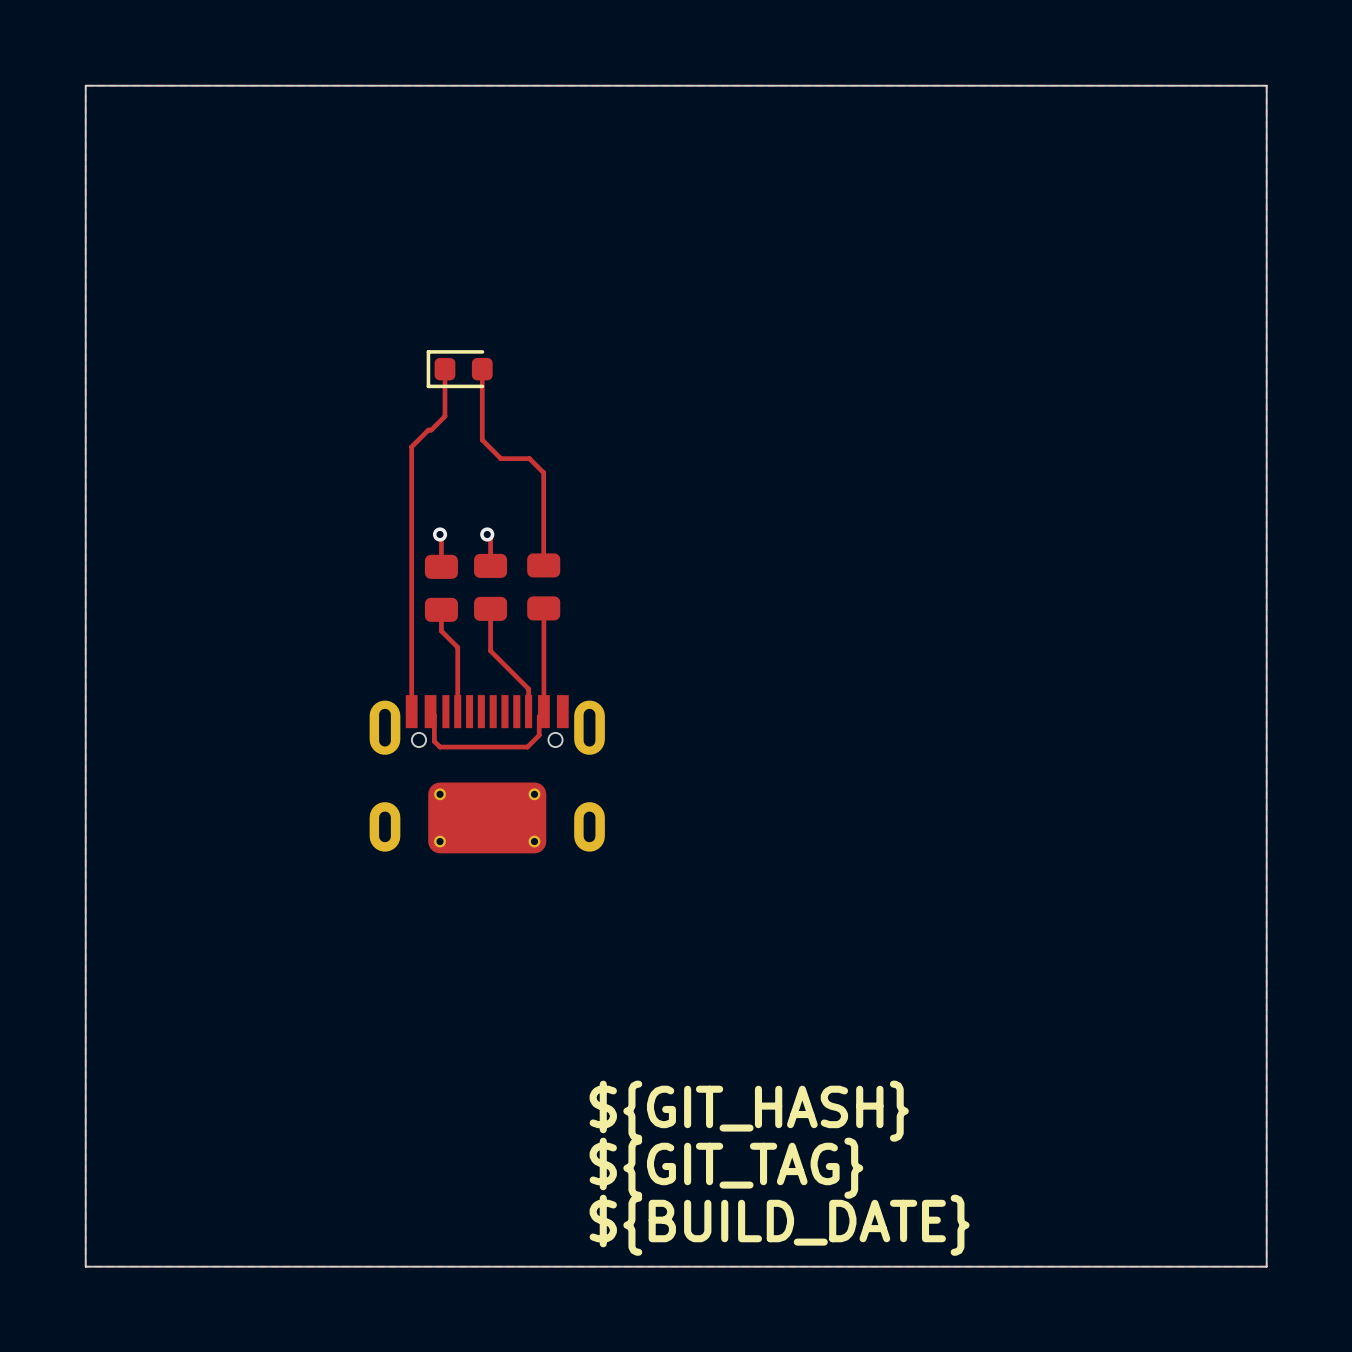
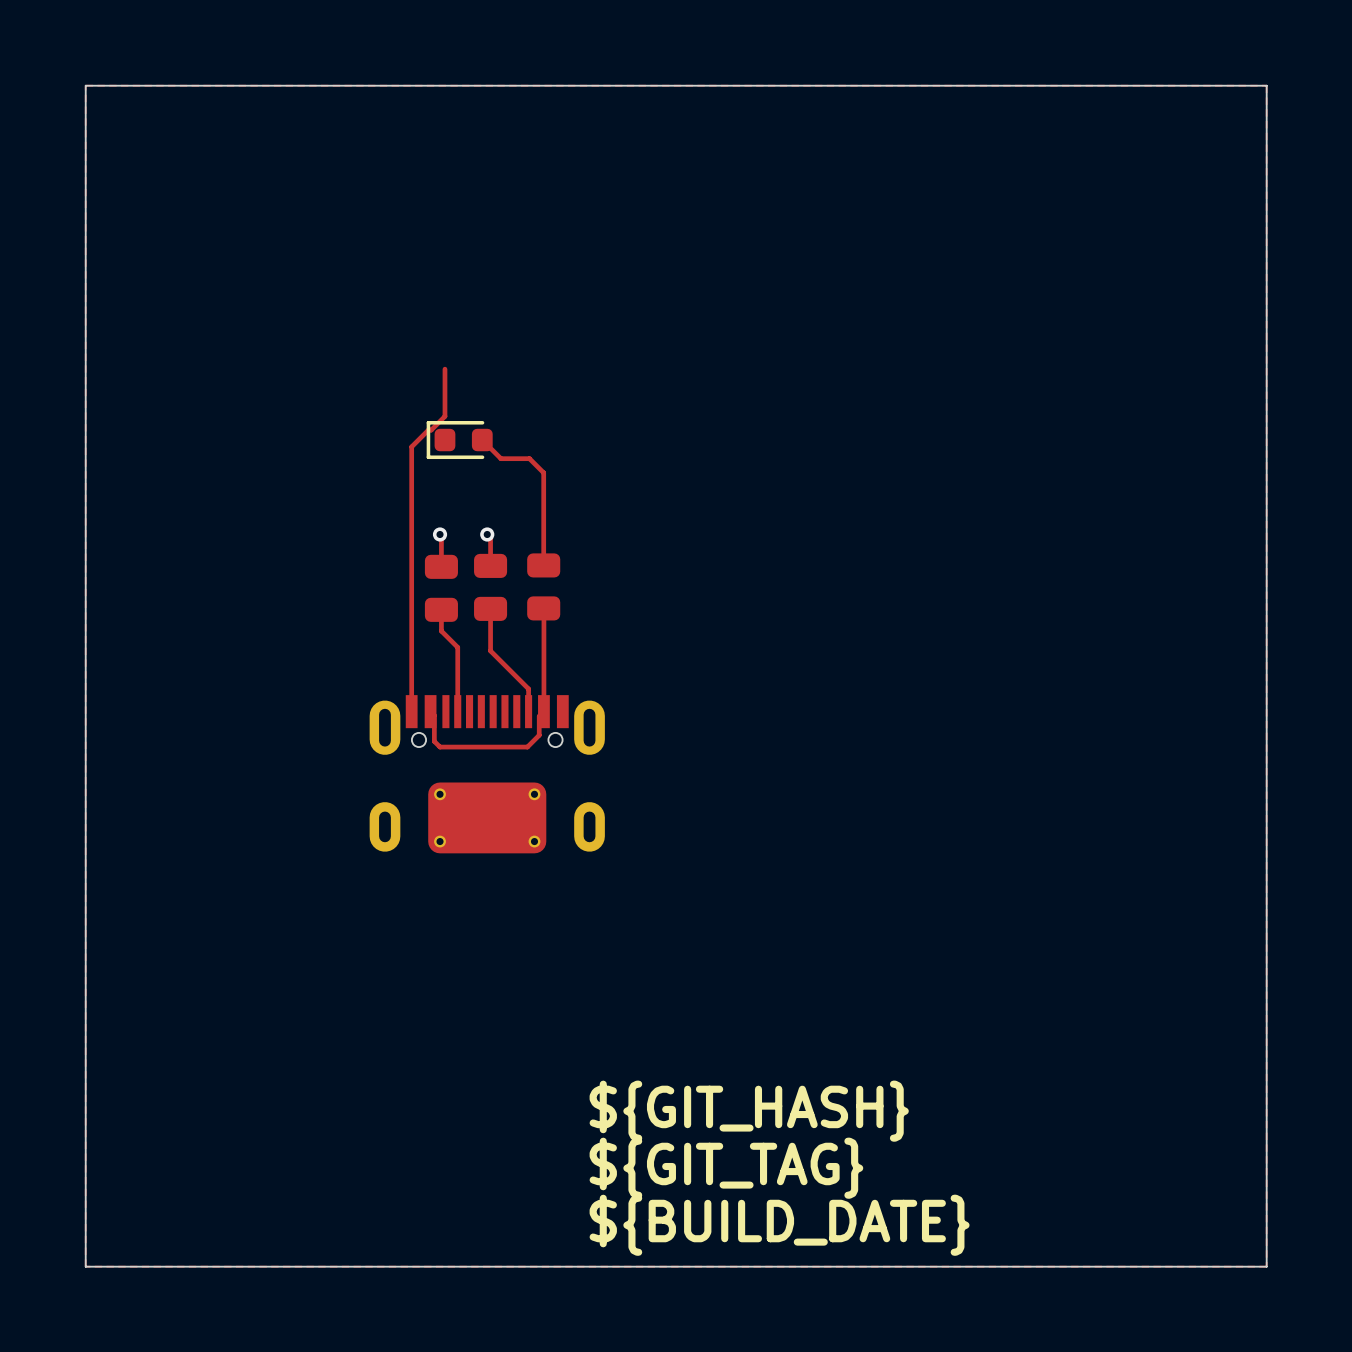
part position: (459, 369) -> (459, 440)
track: (482, 369) (482, 440) -> none

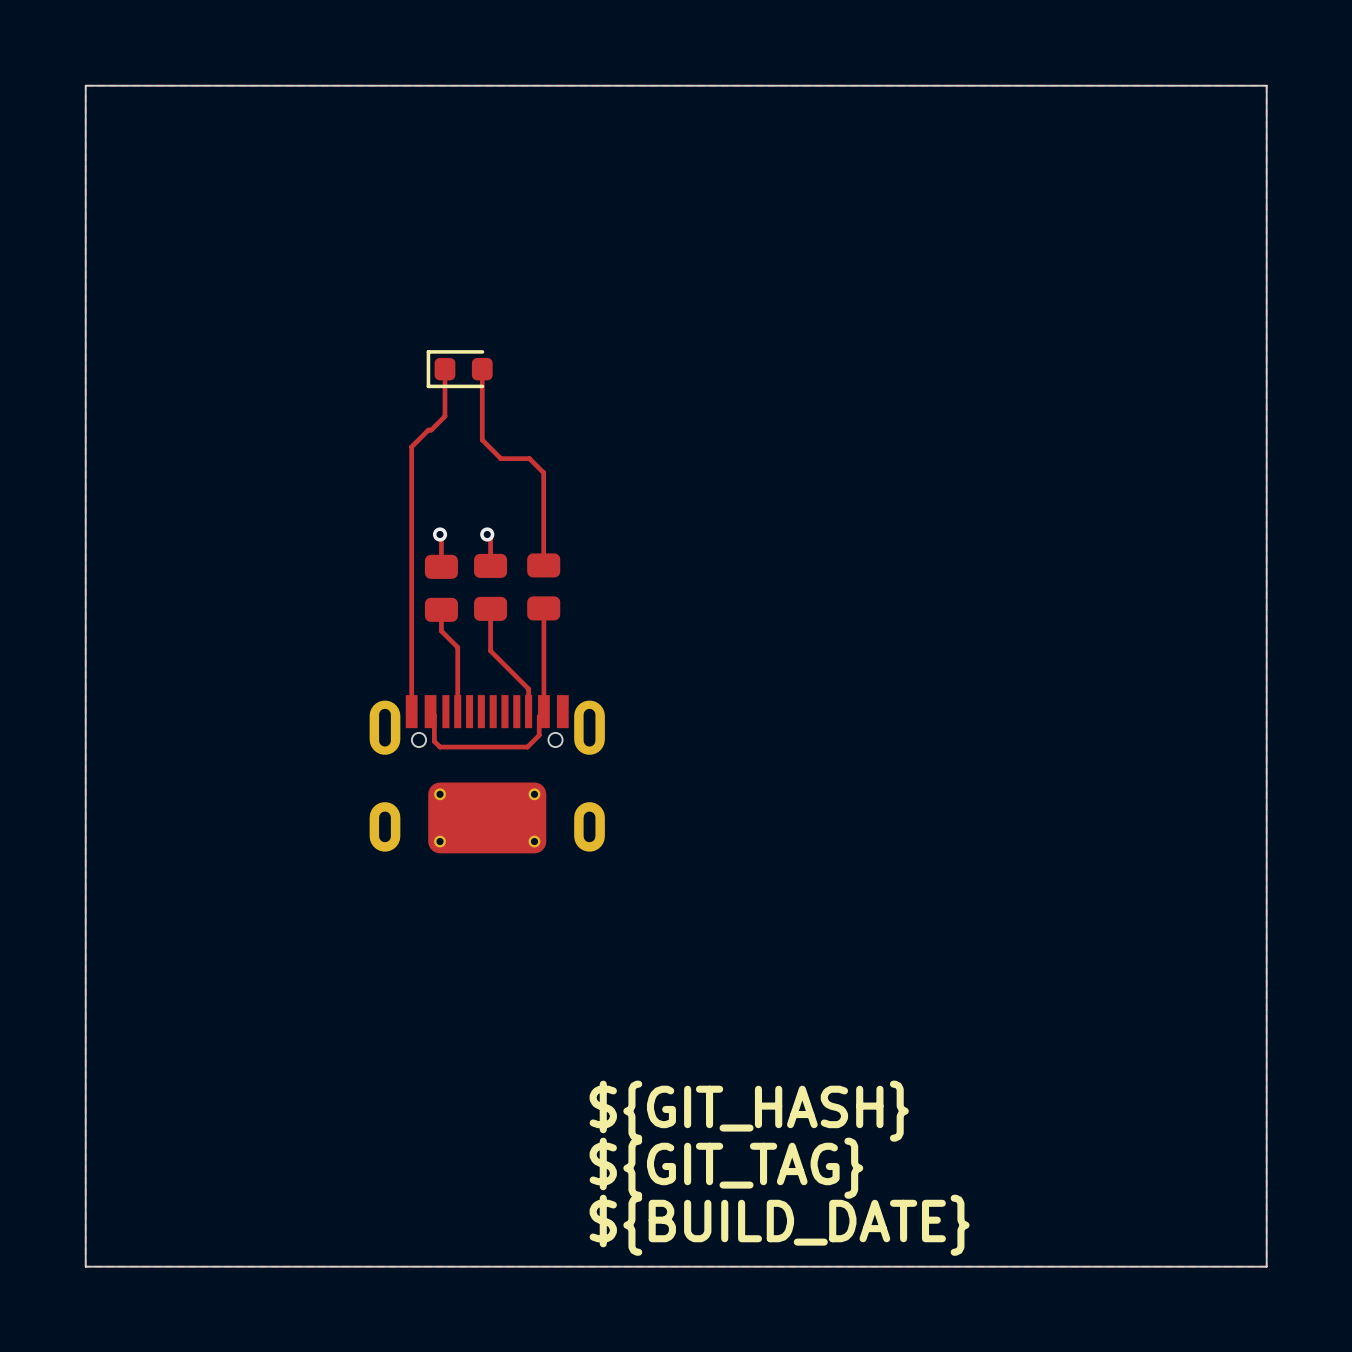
track: none -> (482, 369) (482, 440)
part position: (459, 440) -> (459, 369)

